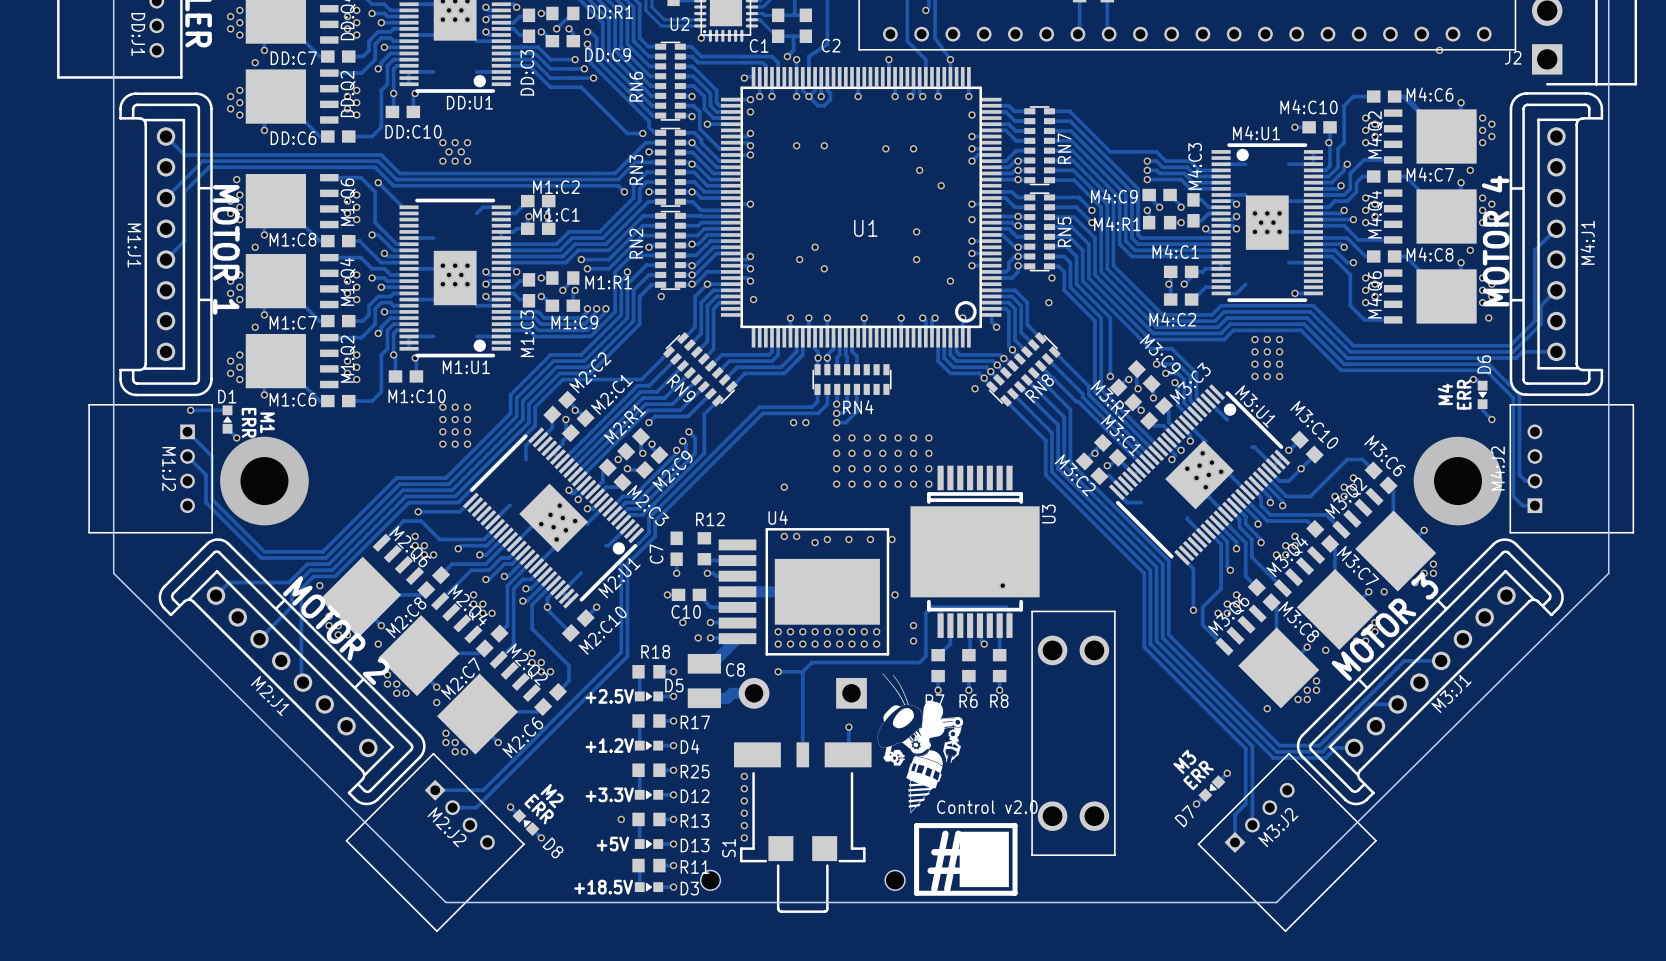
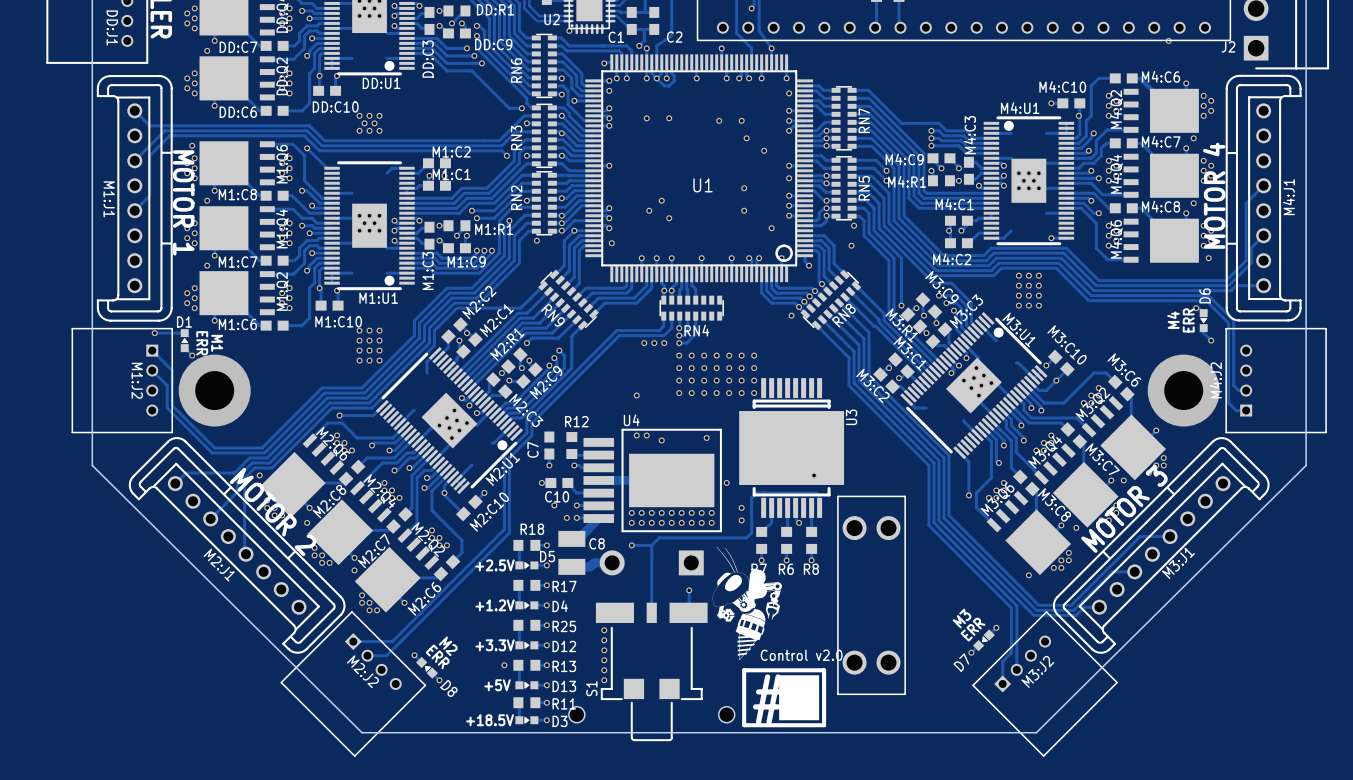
via: none -> (664, 343)
via: (827, 539) -> none
via: (848, 539) -> none
via: (891, 539) -> none

